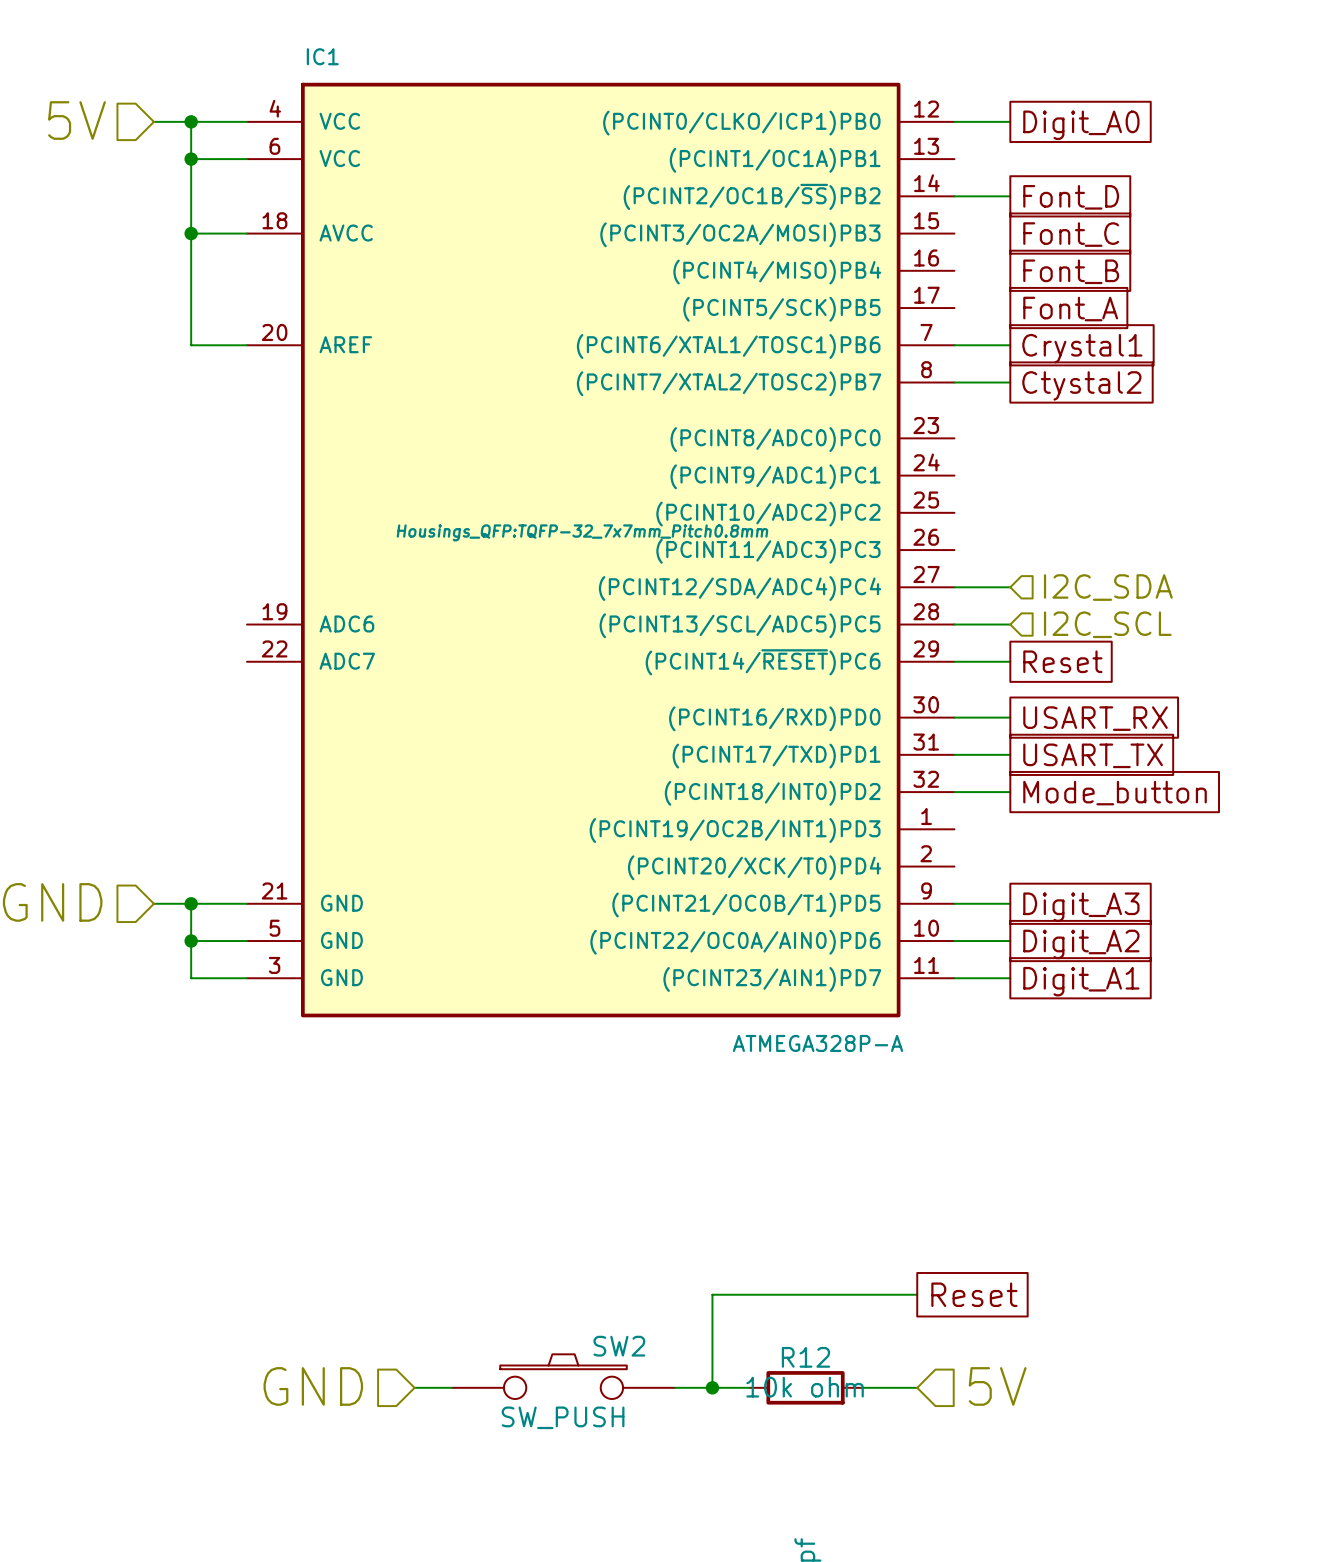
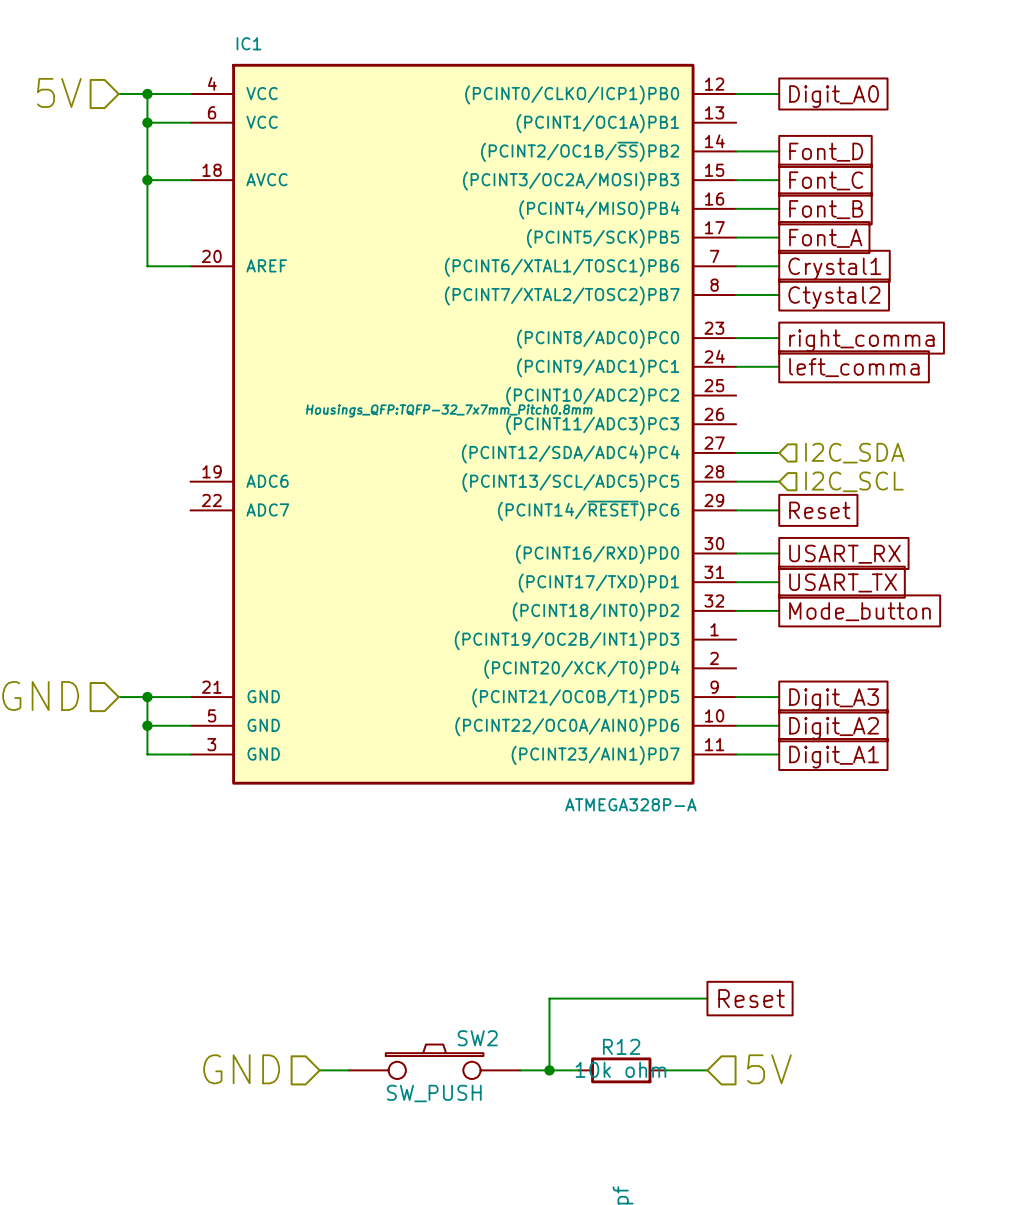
wire: none -> (736, 180) (779, 180)
wire: none -> (736, 208) (779, 208)
wire: none -> (736, 237) (779, 237)
wire: none -> (736, 338) (779, 338)
global label: none -> right_comma (861, 340)
wire: none -> (736, 366) (779, 366)
global label: none -> left_comma (854, 367)

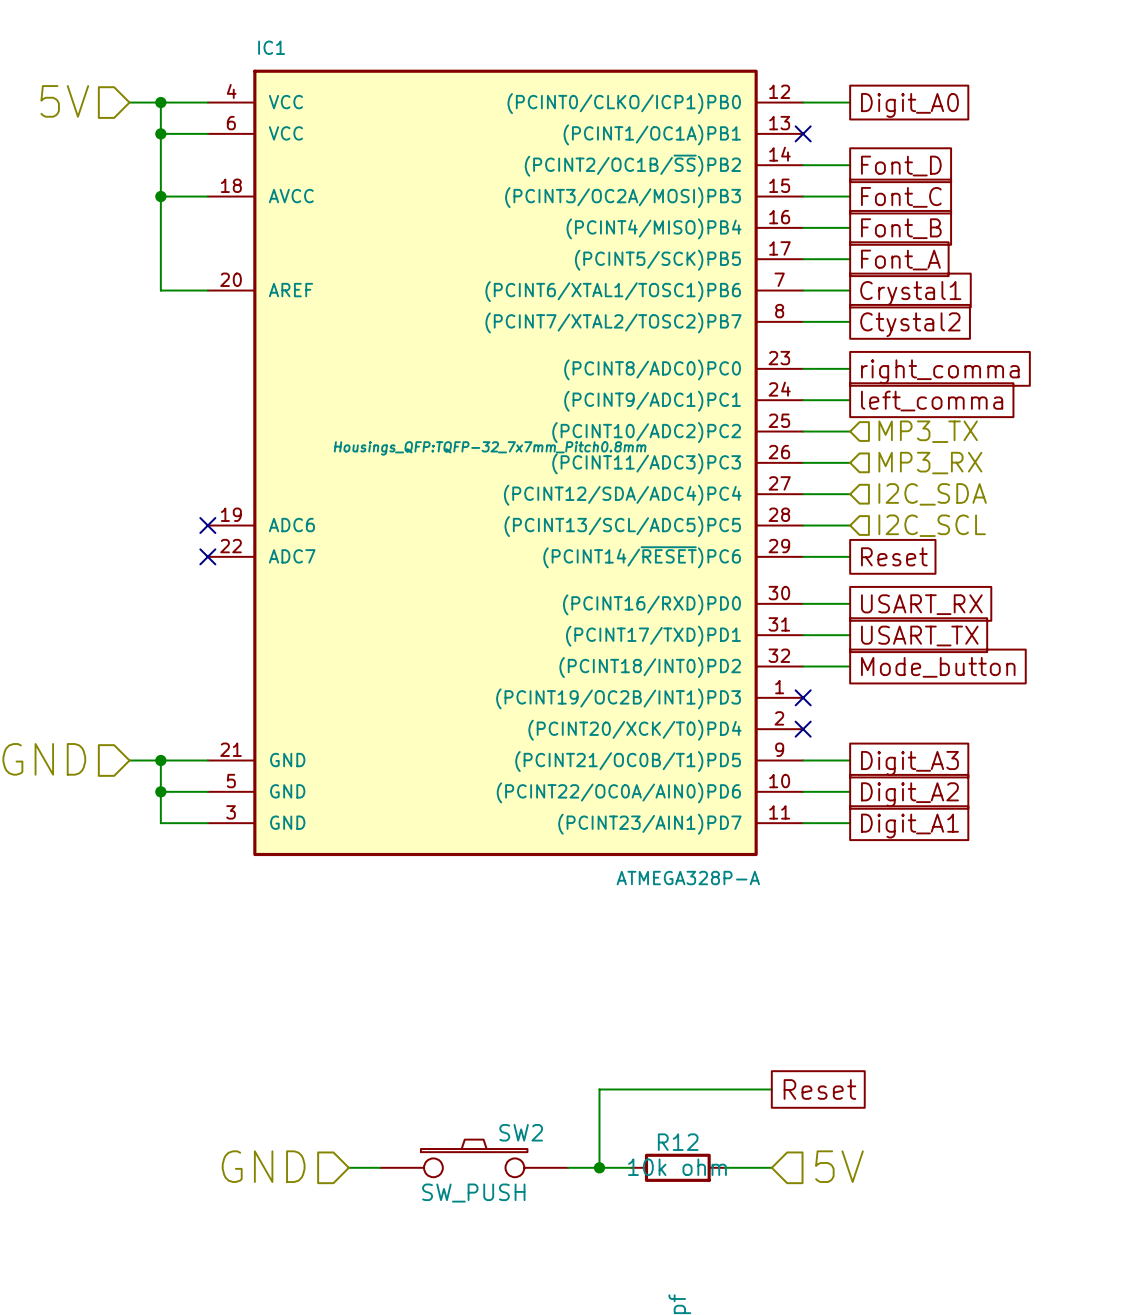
no-connect mark: none -> (803, 133)
wire: none -> (803, 431) (850, 431)
hierarchical label: none -> MP3_TX (928, 431)
wire: none -> (803, 462) (850, 462)
hierarchical label: none -> MP3_RX (930, 463)
no-connect mark: none -> (207, 525)
no-connect mark: none -> (207, 556)
no-connect mark: none -> (803, 697)
no-connect mark: none -> (803, 729)

